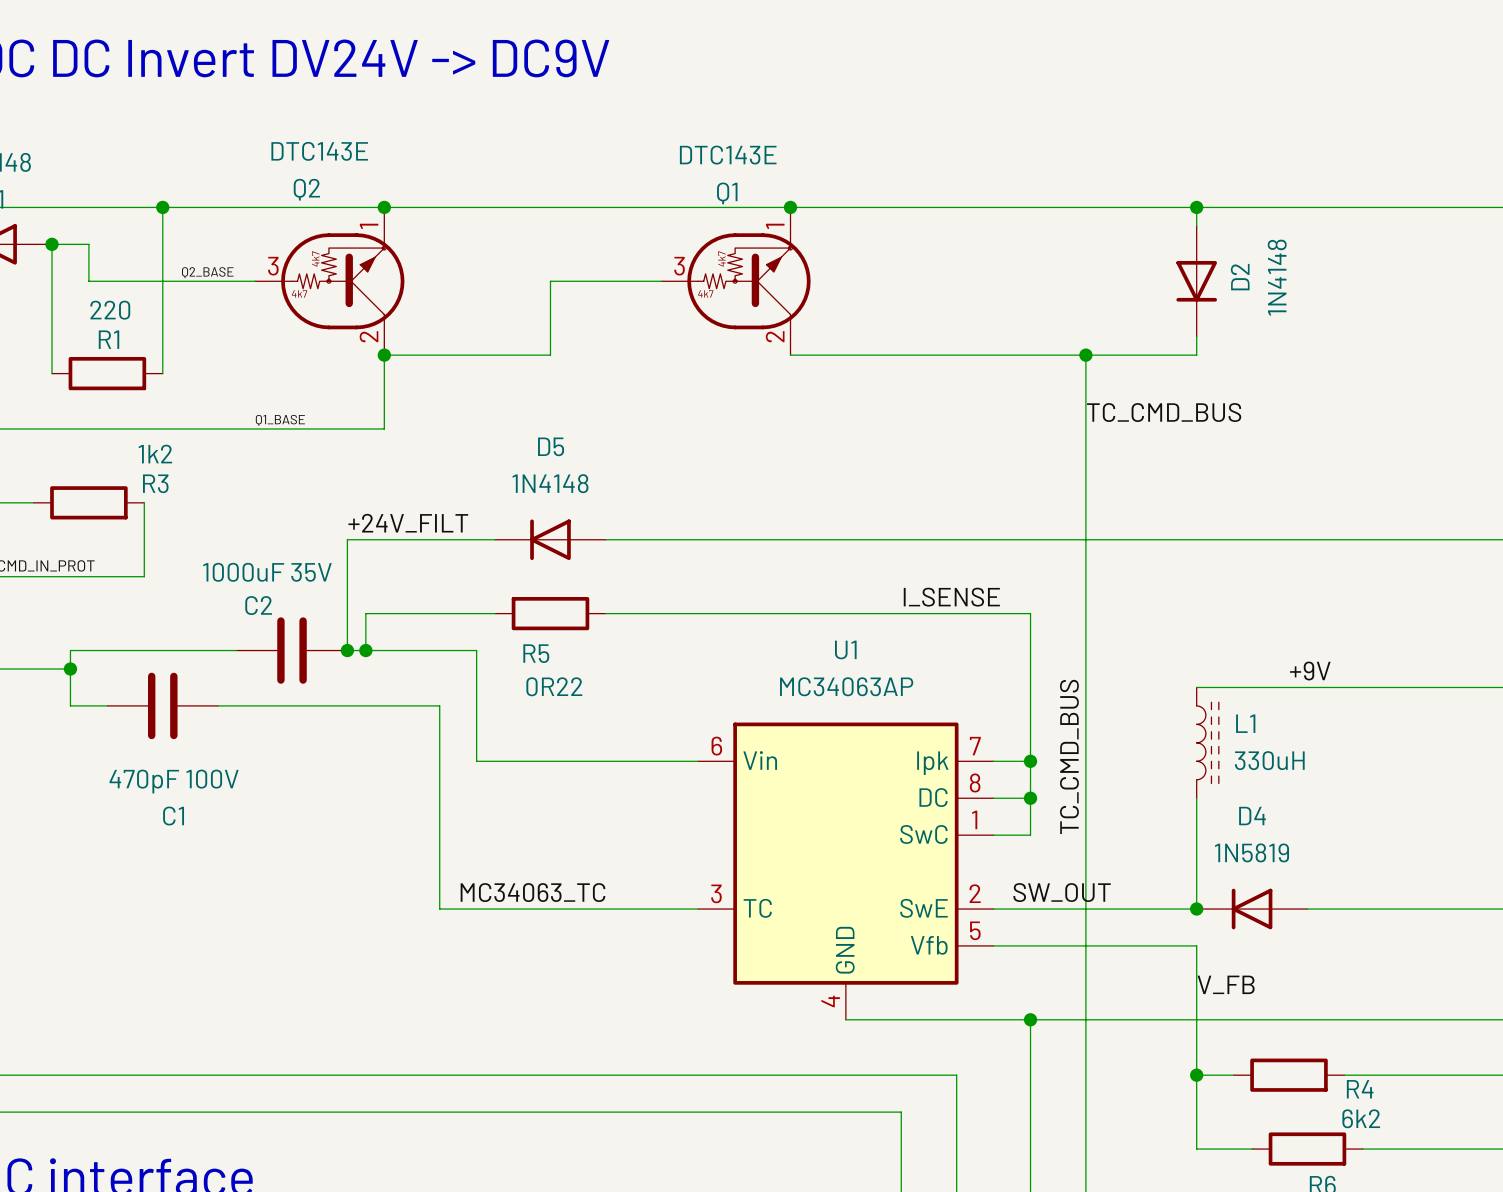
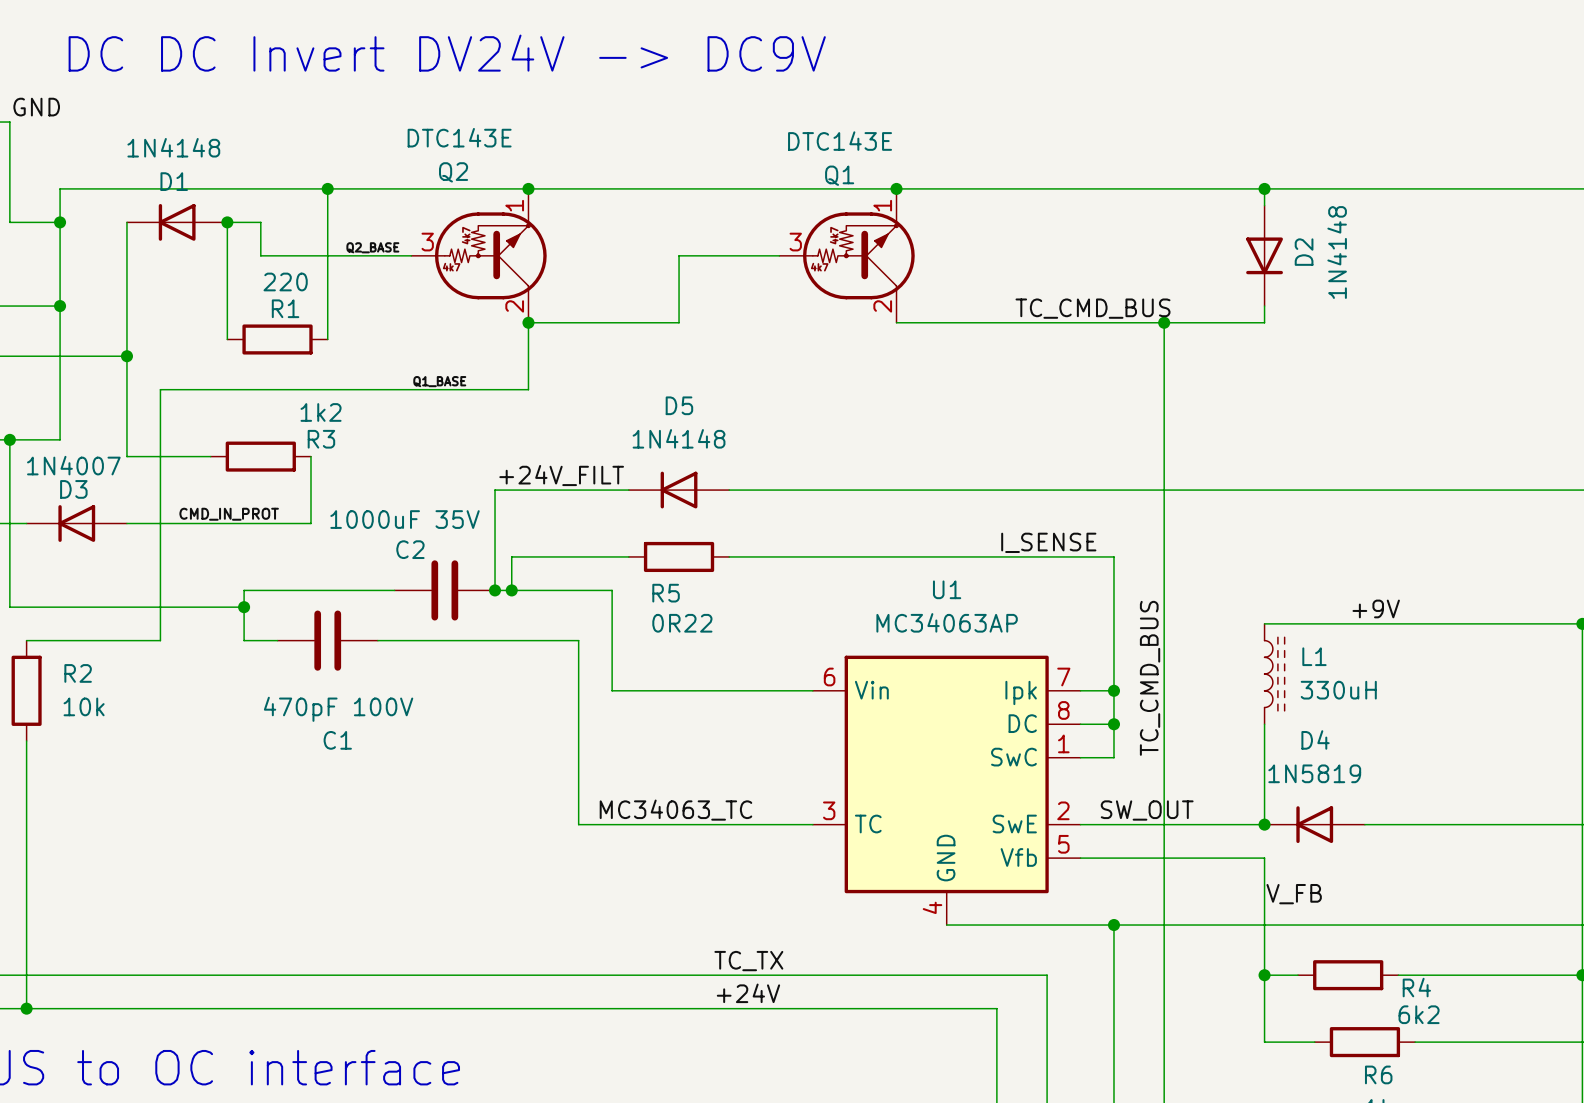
label position: TC_CMD_BUS (1164, 412) -> TC_CMD_BUS (1093, 308)
label: none -> TC_TX (748, 961)
label: none -> +24V (748, 993)

